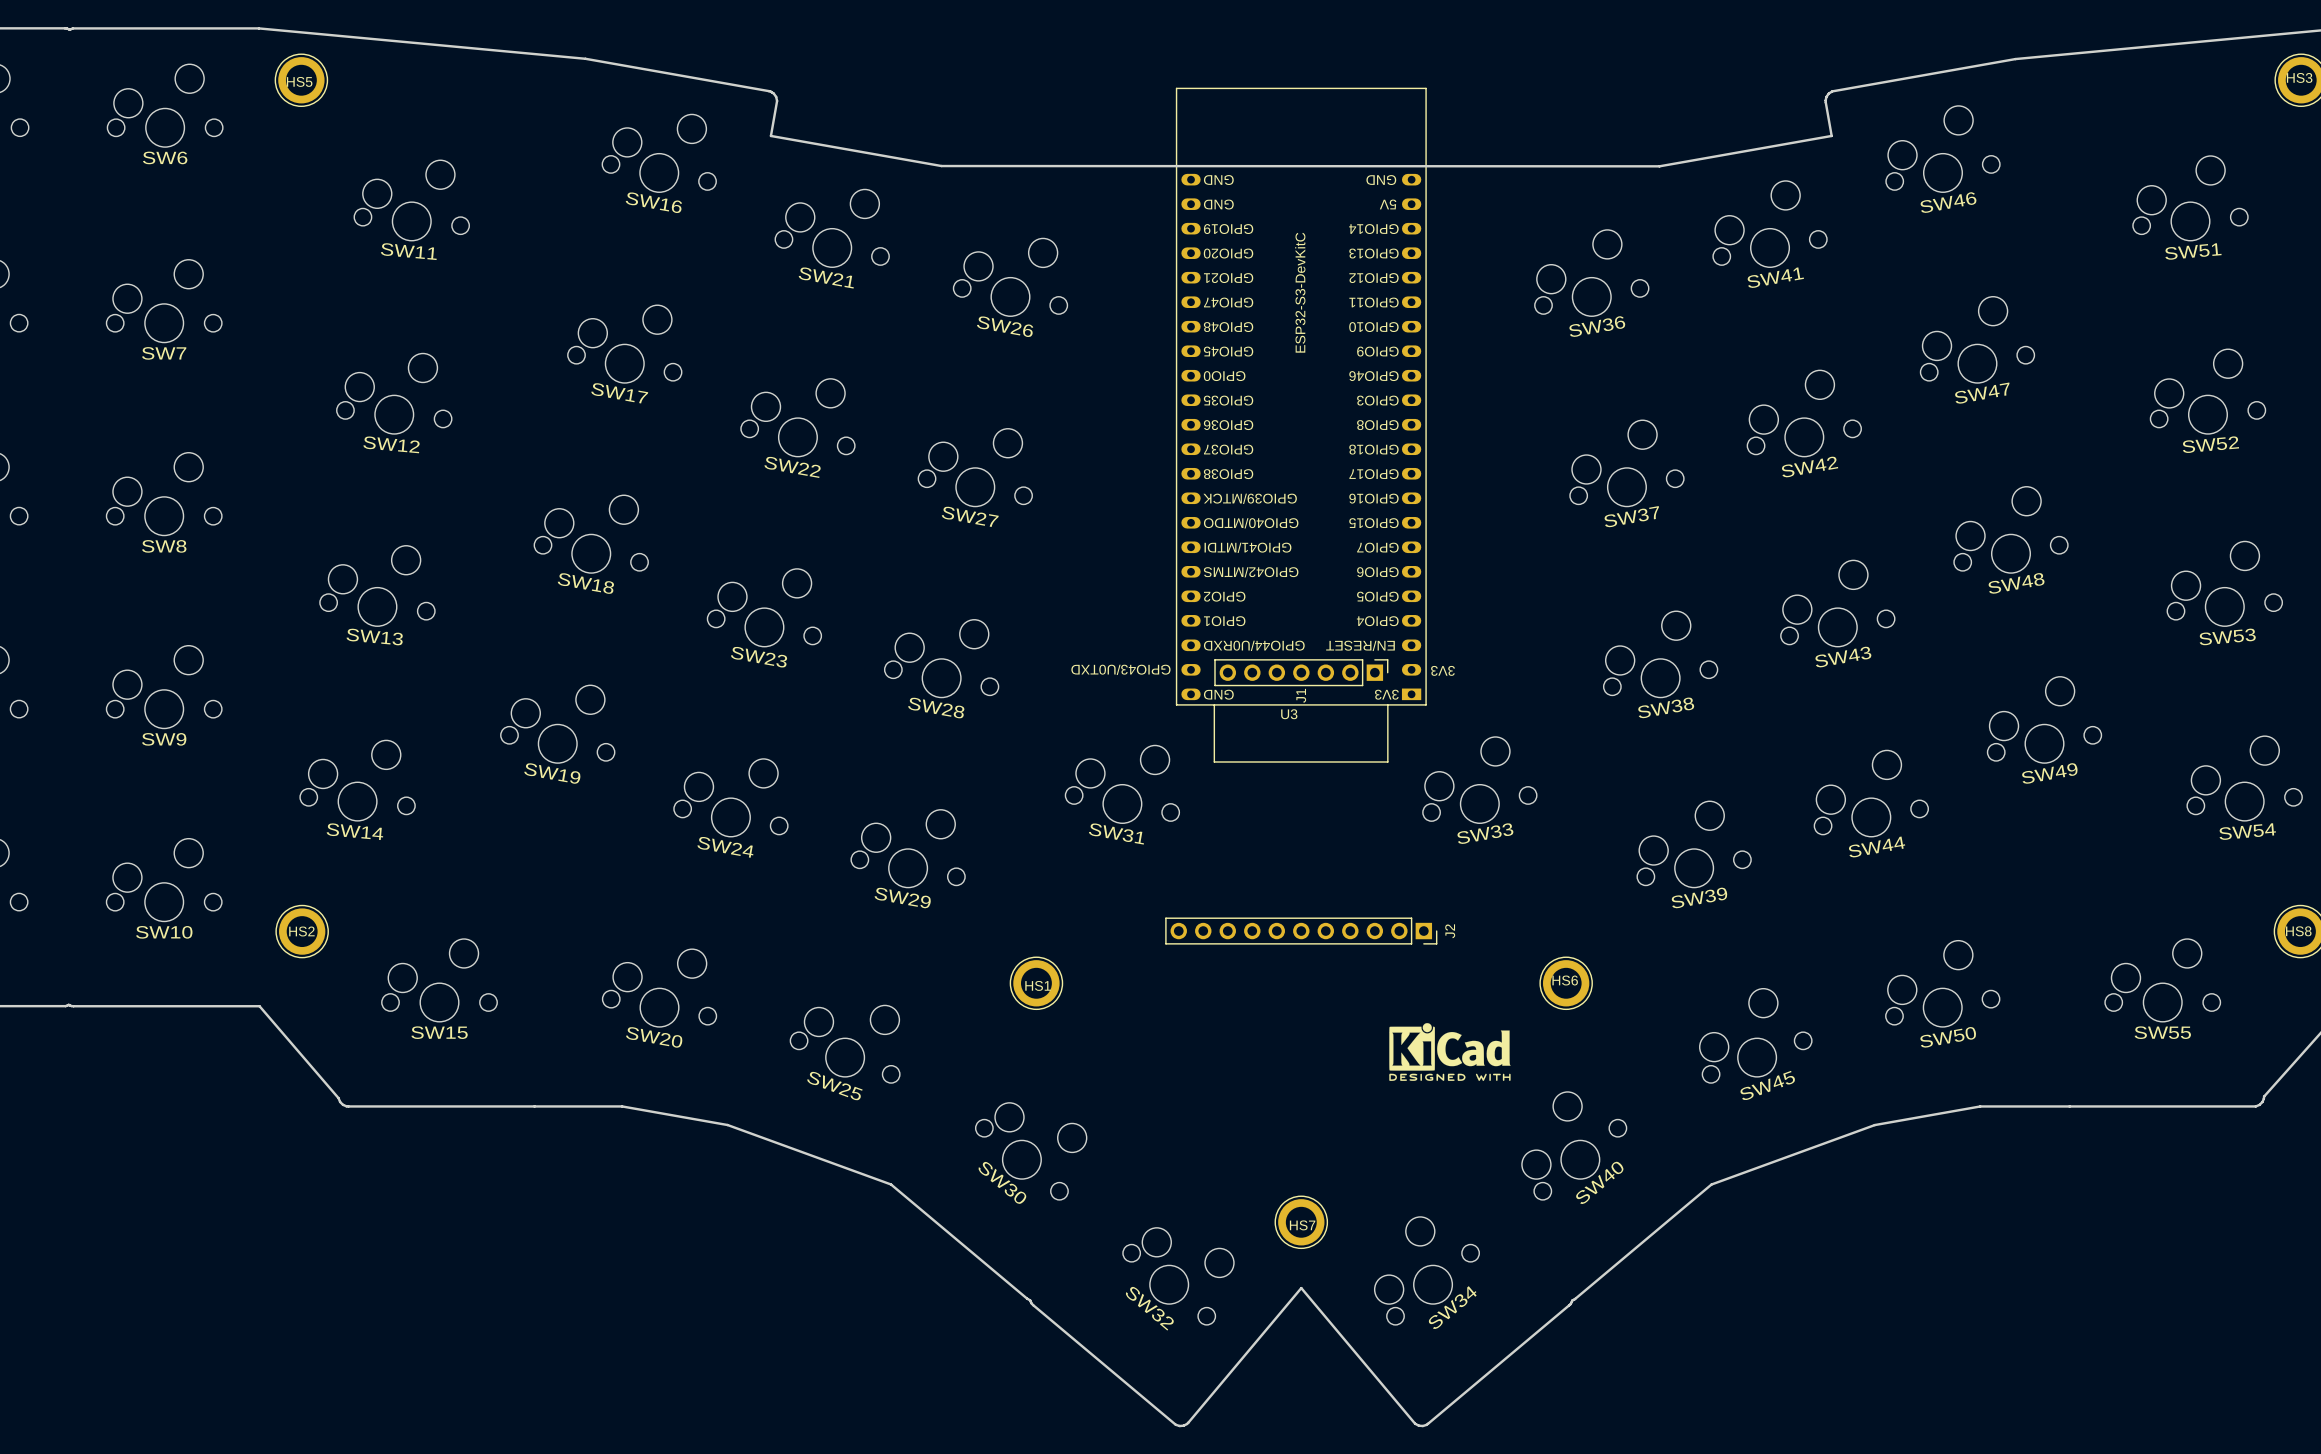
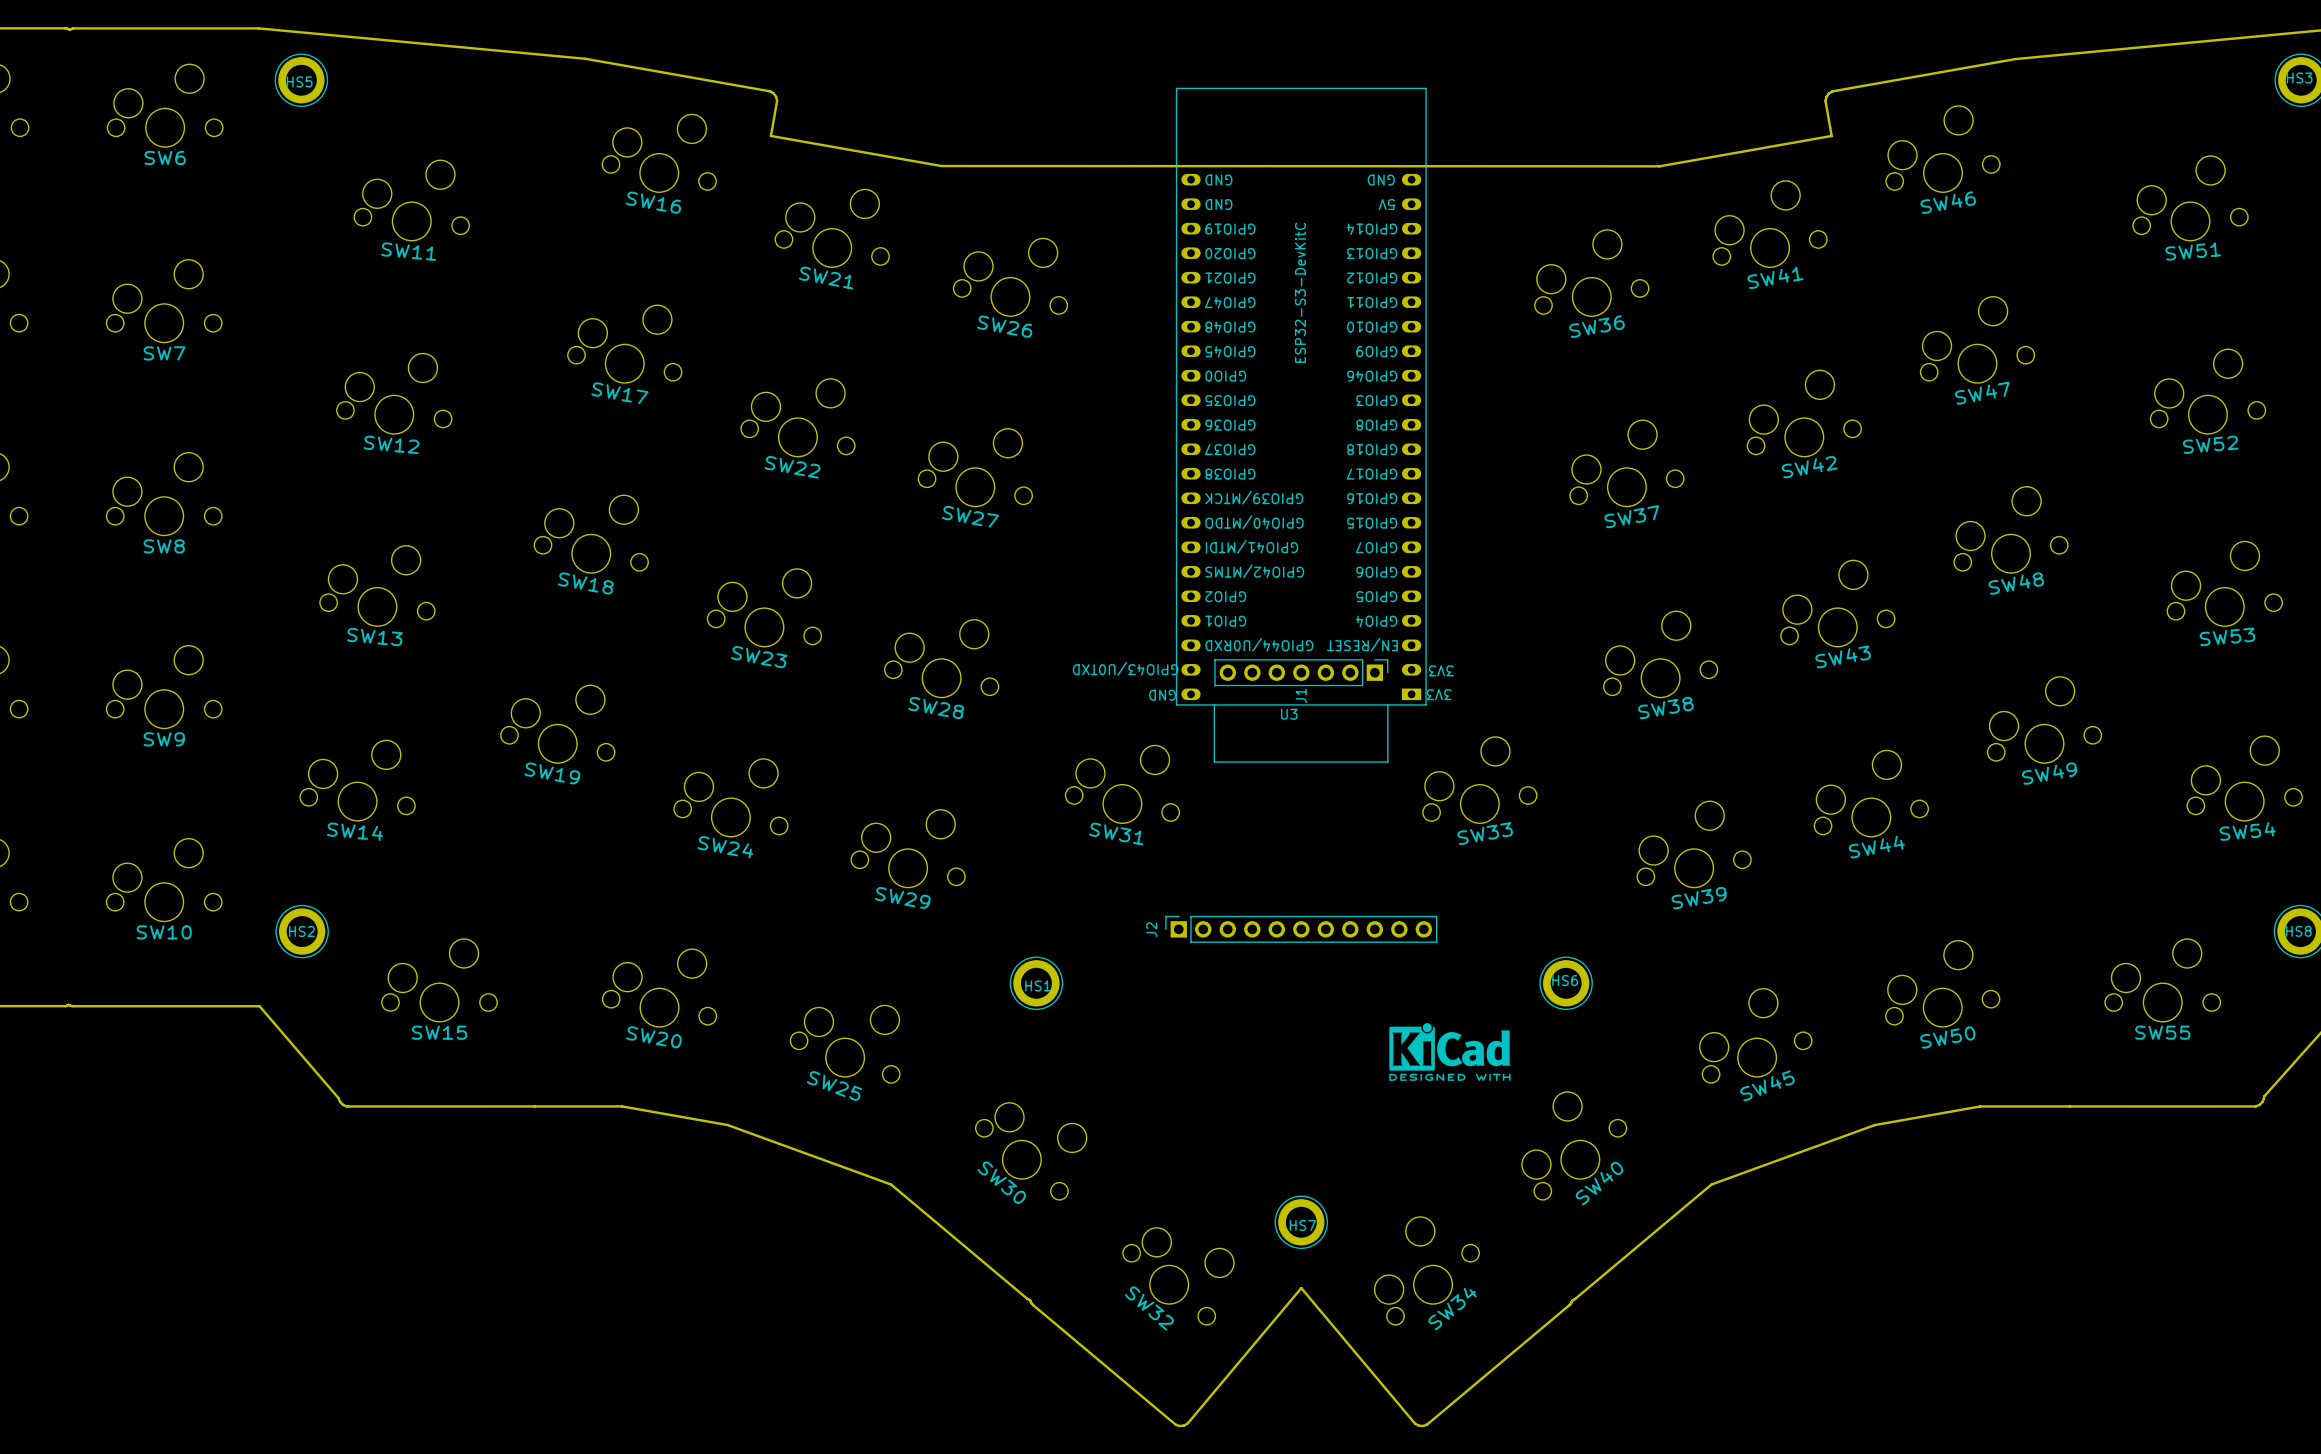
U3 text position: GND (1218, 694) -> GND (1162, 695)
U3 text position: 3V3 (1386, 694) -> 3V3 (1439, 694)
J2 rotation: 0° (1301, 931) -> 180° (1301, 929)

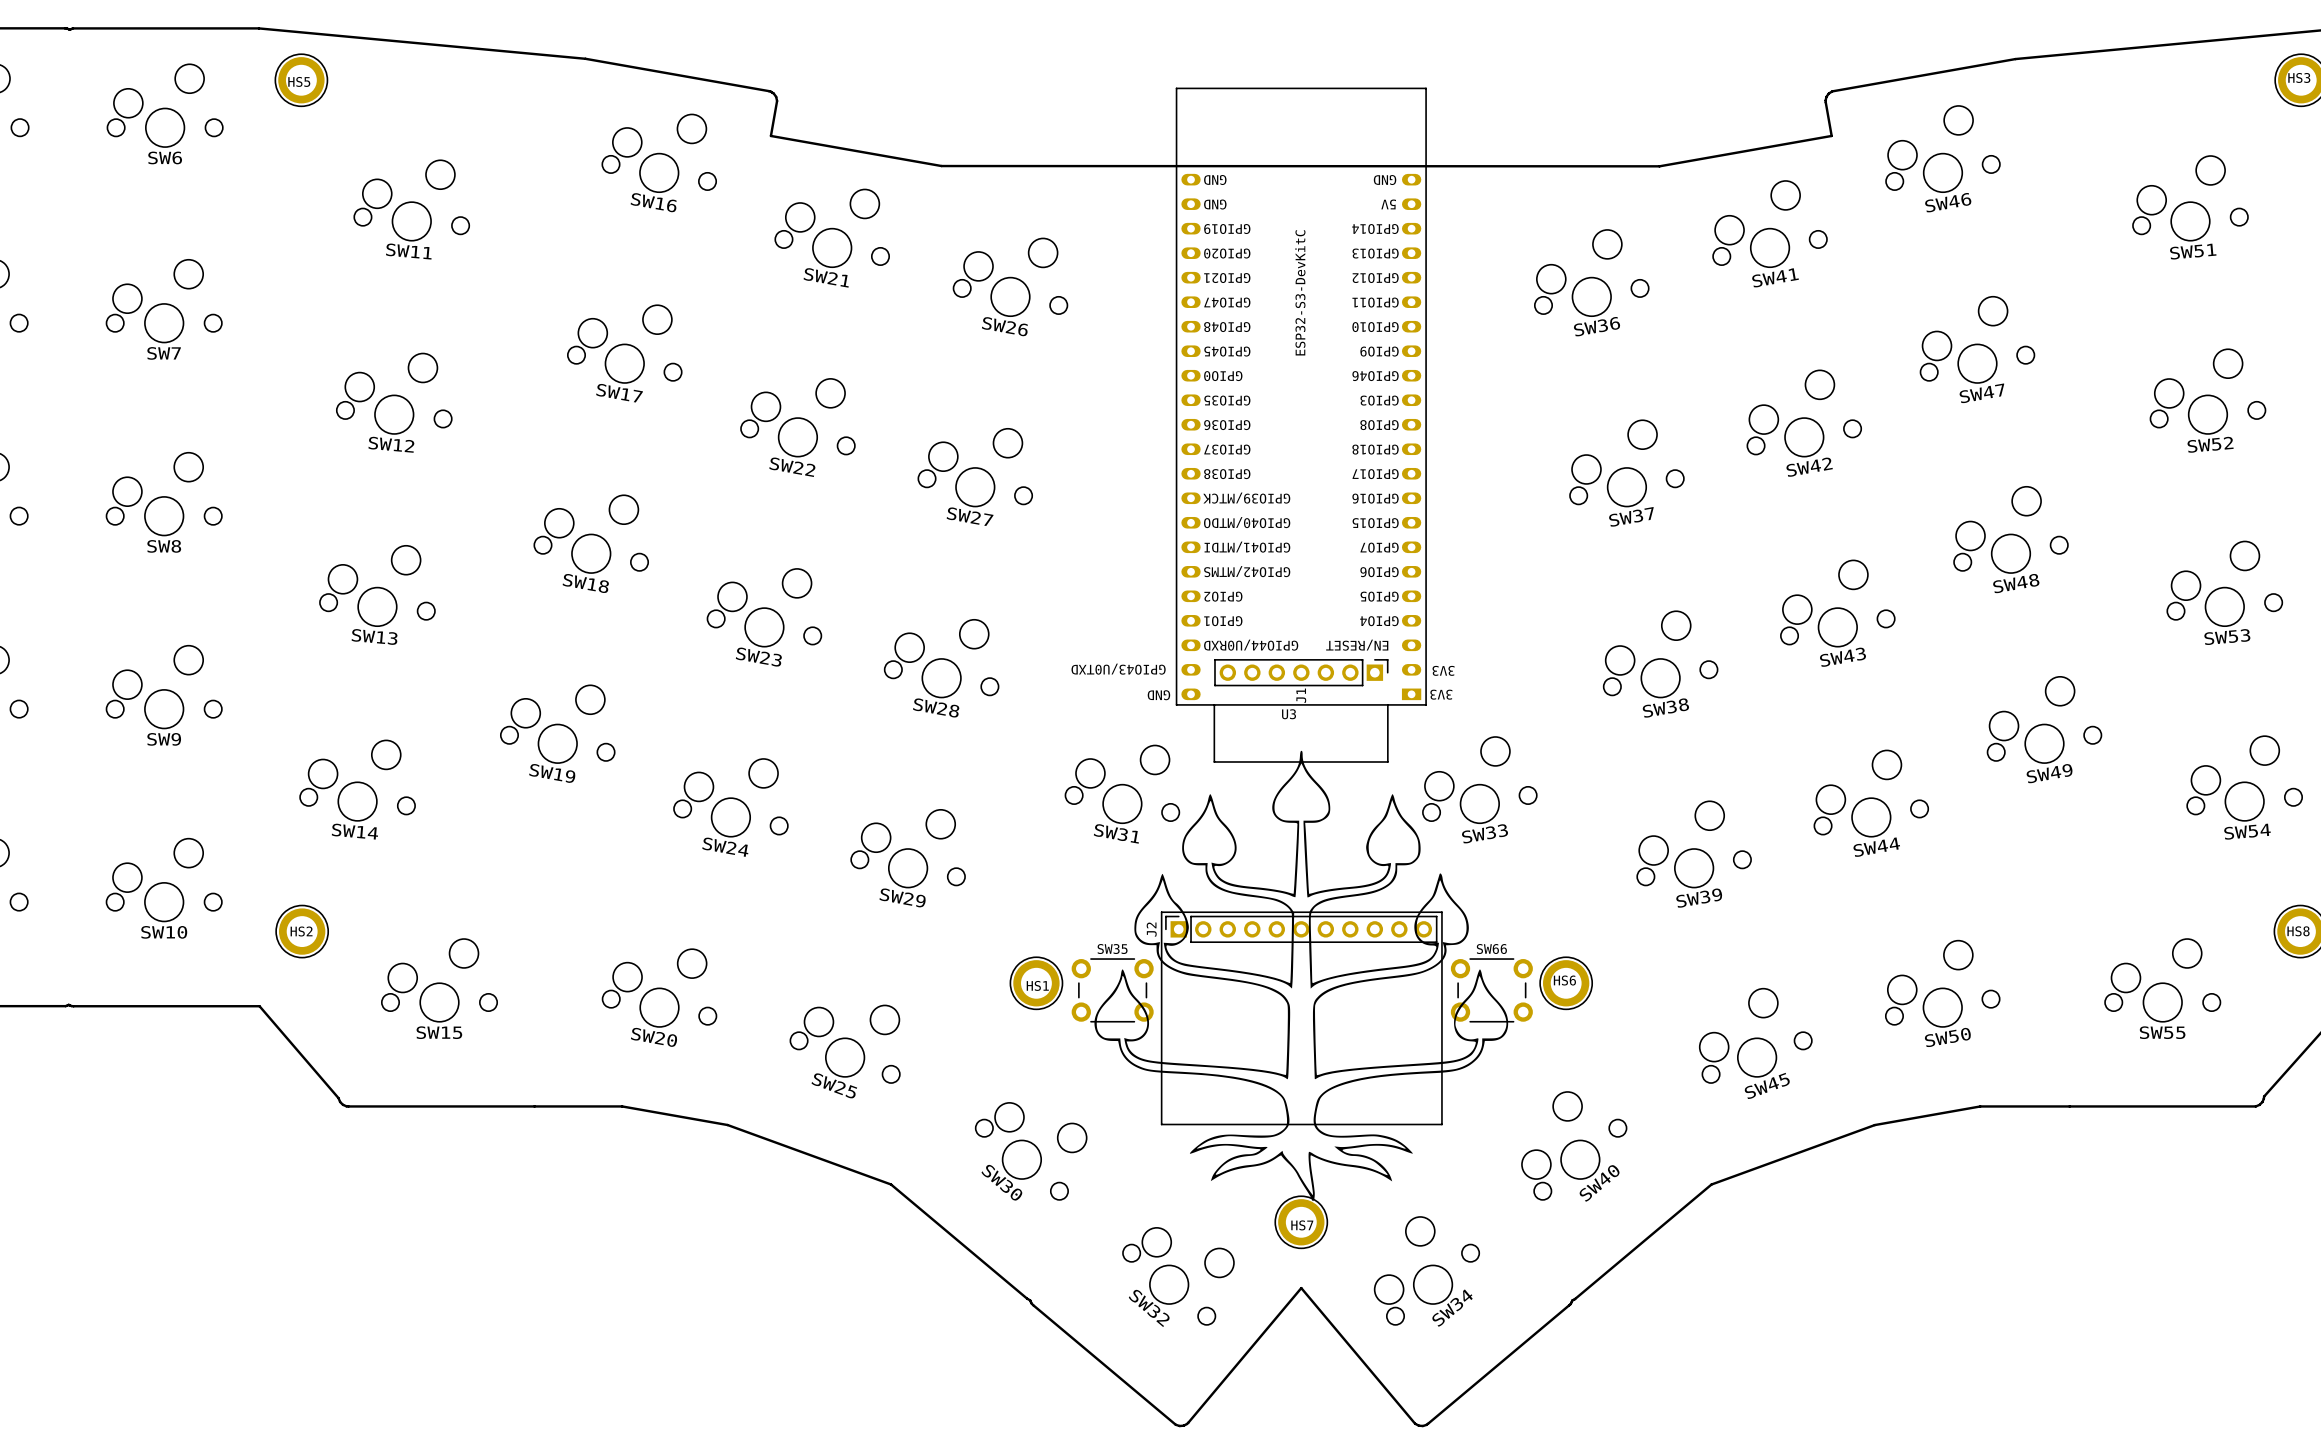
drawing: none -> [1094, 750, 1509, 1202]
line: none -> (1161, 912) (1441, 912) (1441, 1124) (1161, 1124) (1161, 912)
SW35: none -> (1112, 990)
SW66: none -> (1491, 990)
drawing: [1389, 1023, 1511, 1081] -> none

